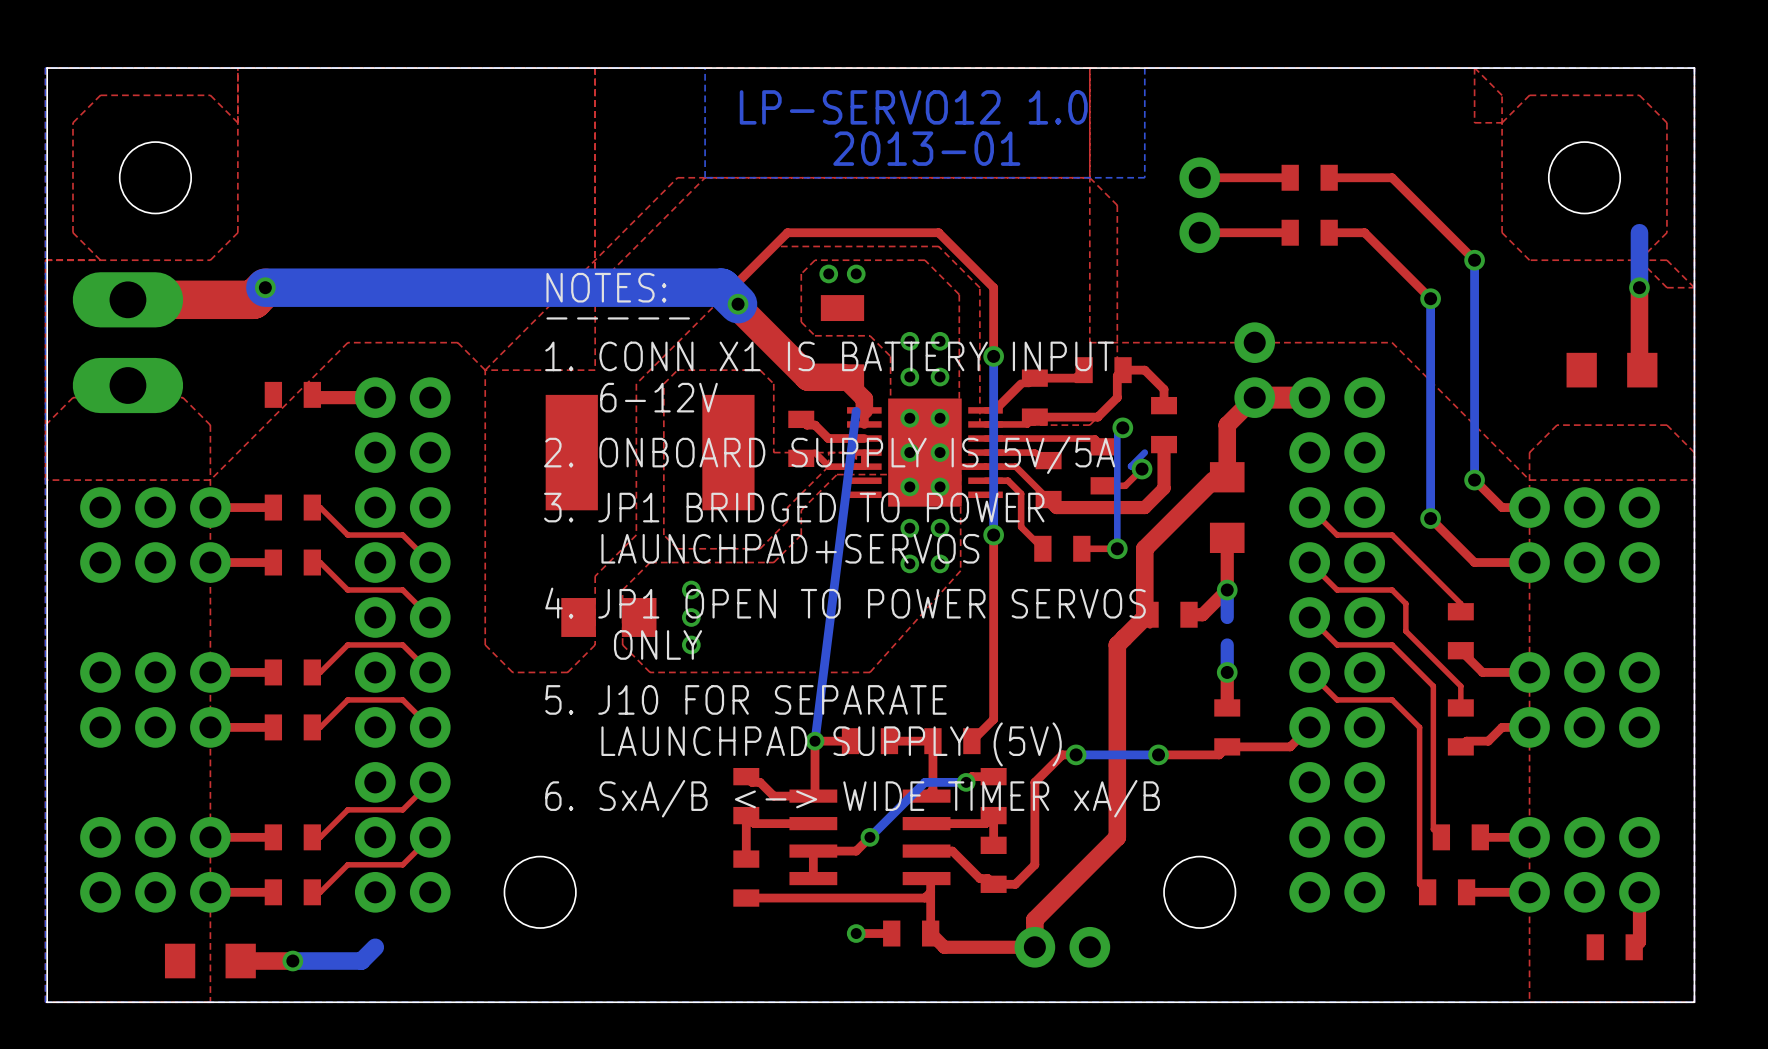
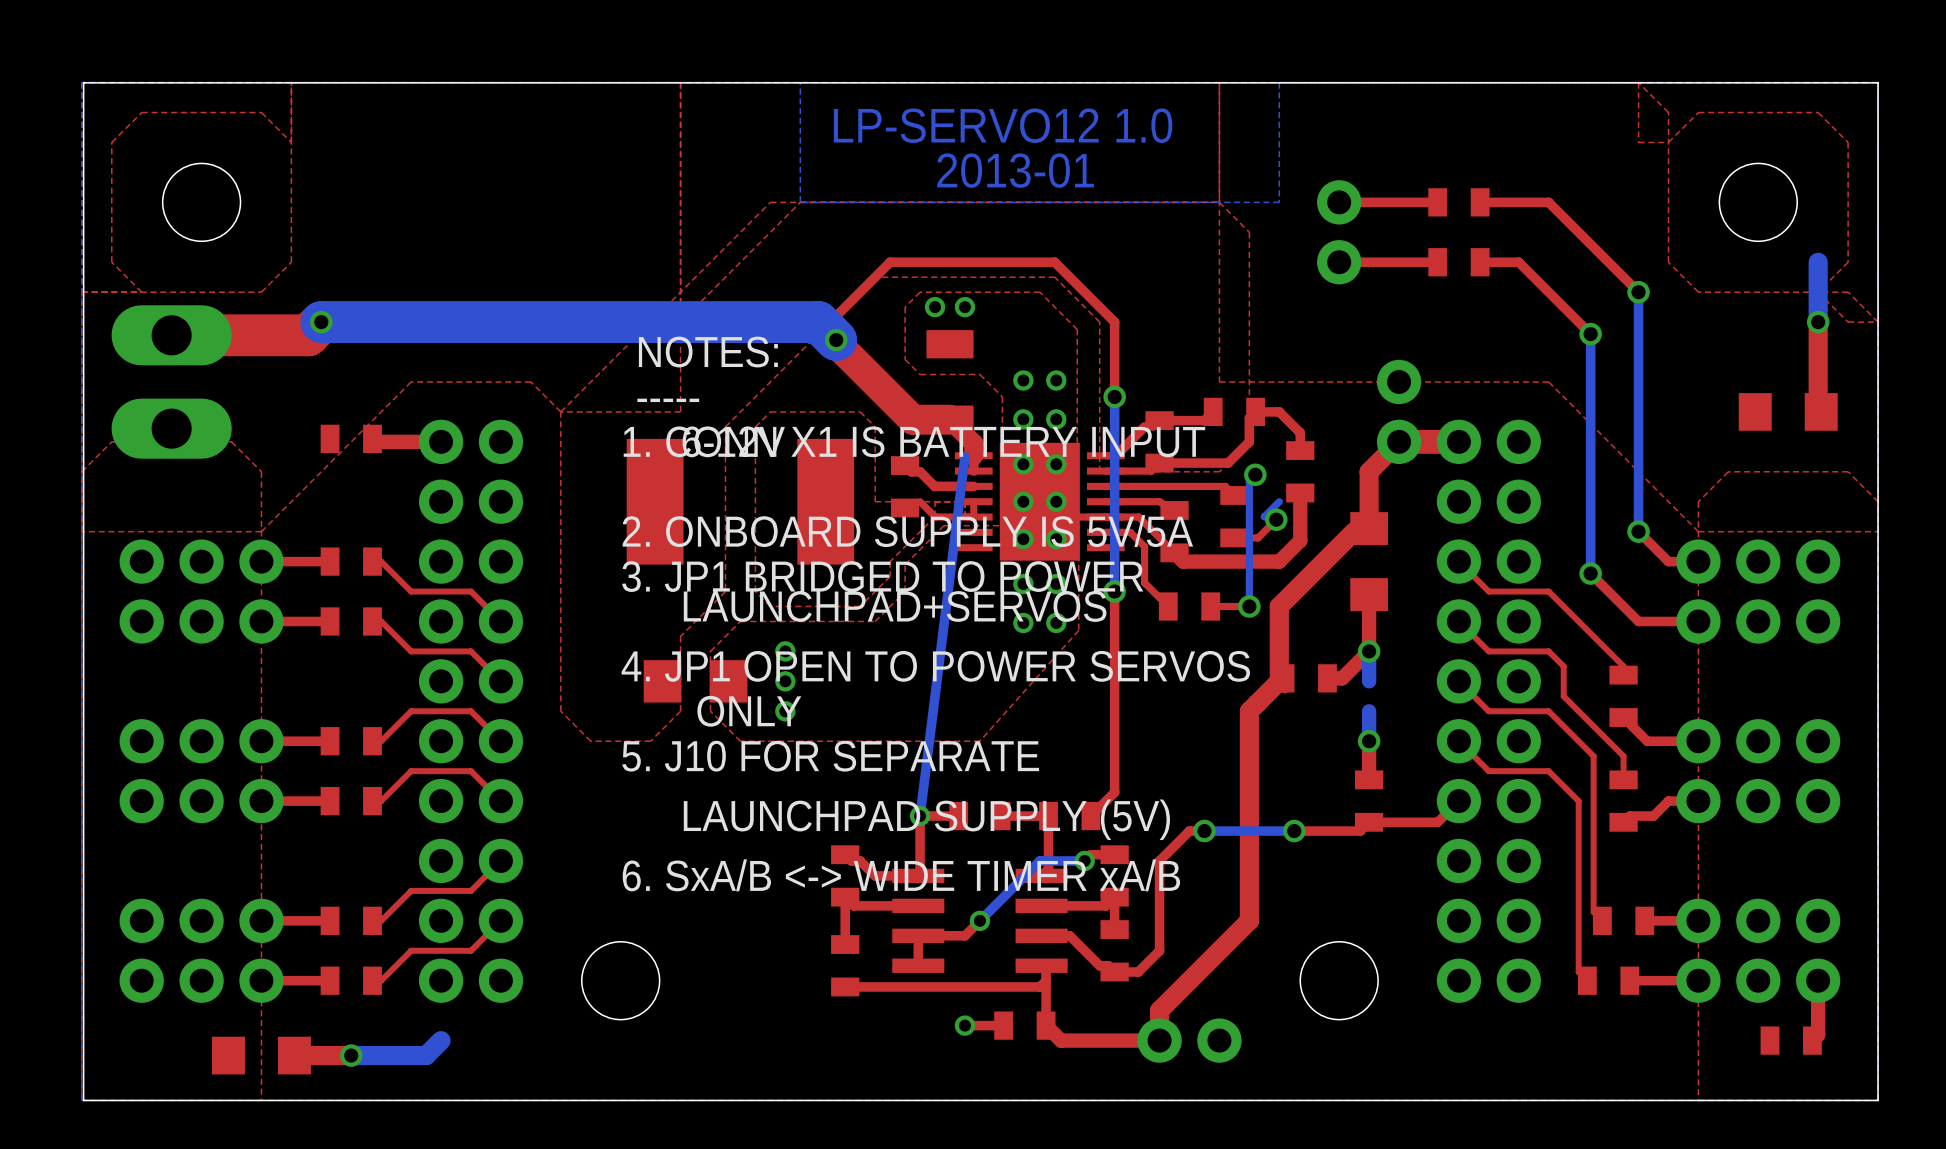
text position: NOTES: (606, 287) -> NOTES: (708, 352)
text position: ----- (618, 318) -> ----- (668, 400)
text position: 1. CONN X1 IS BATTERY INPUT (829, 356) -> 1. CONN X1 IS BATTERY INPUT (914, 441)
text position: 2. ONBOARD SUPPLY IS 5V/5A (829, 455) -> 2. ONBOARD SUPPLY IS 5V/5A (907, 531)
text position: 3. JP1 BRIDGED TO POWER (794, 507) -> 3. JP1 BRIDGED TO POWER (882, 576)
text position: 5. J10 FOR SEPARATE (745, 699) -> 5. J10 FOR SEPARATE (830, 756)

